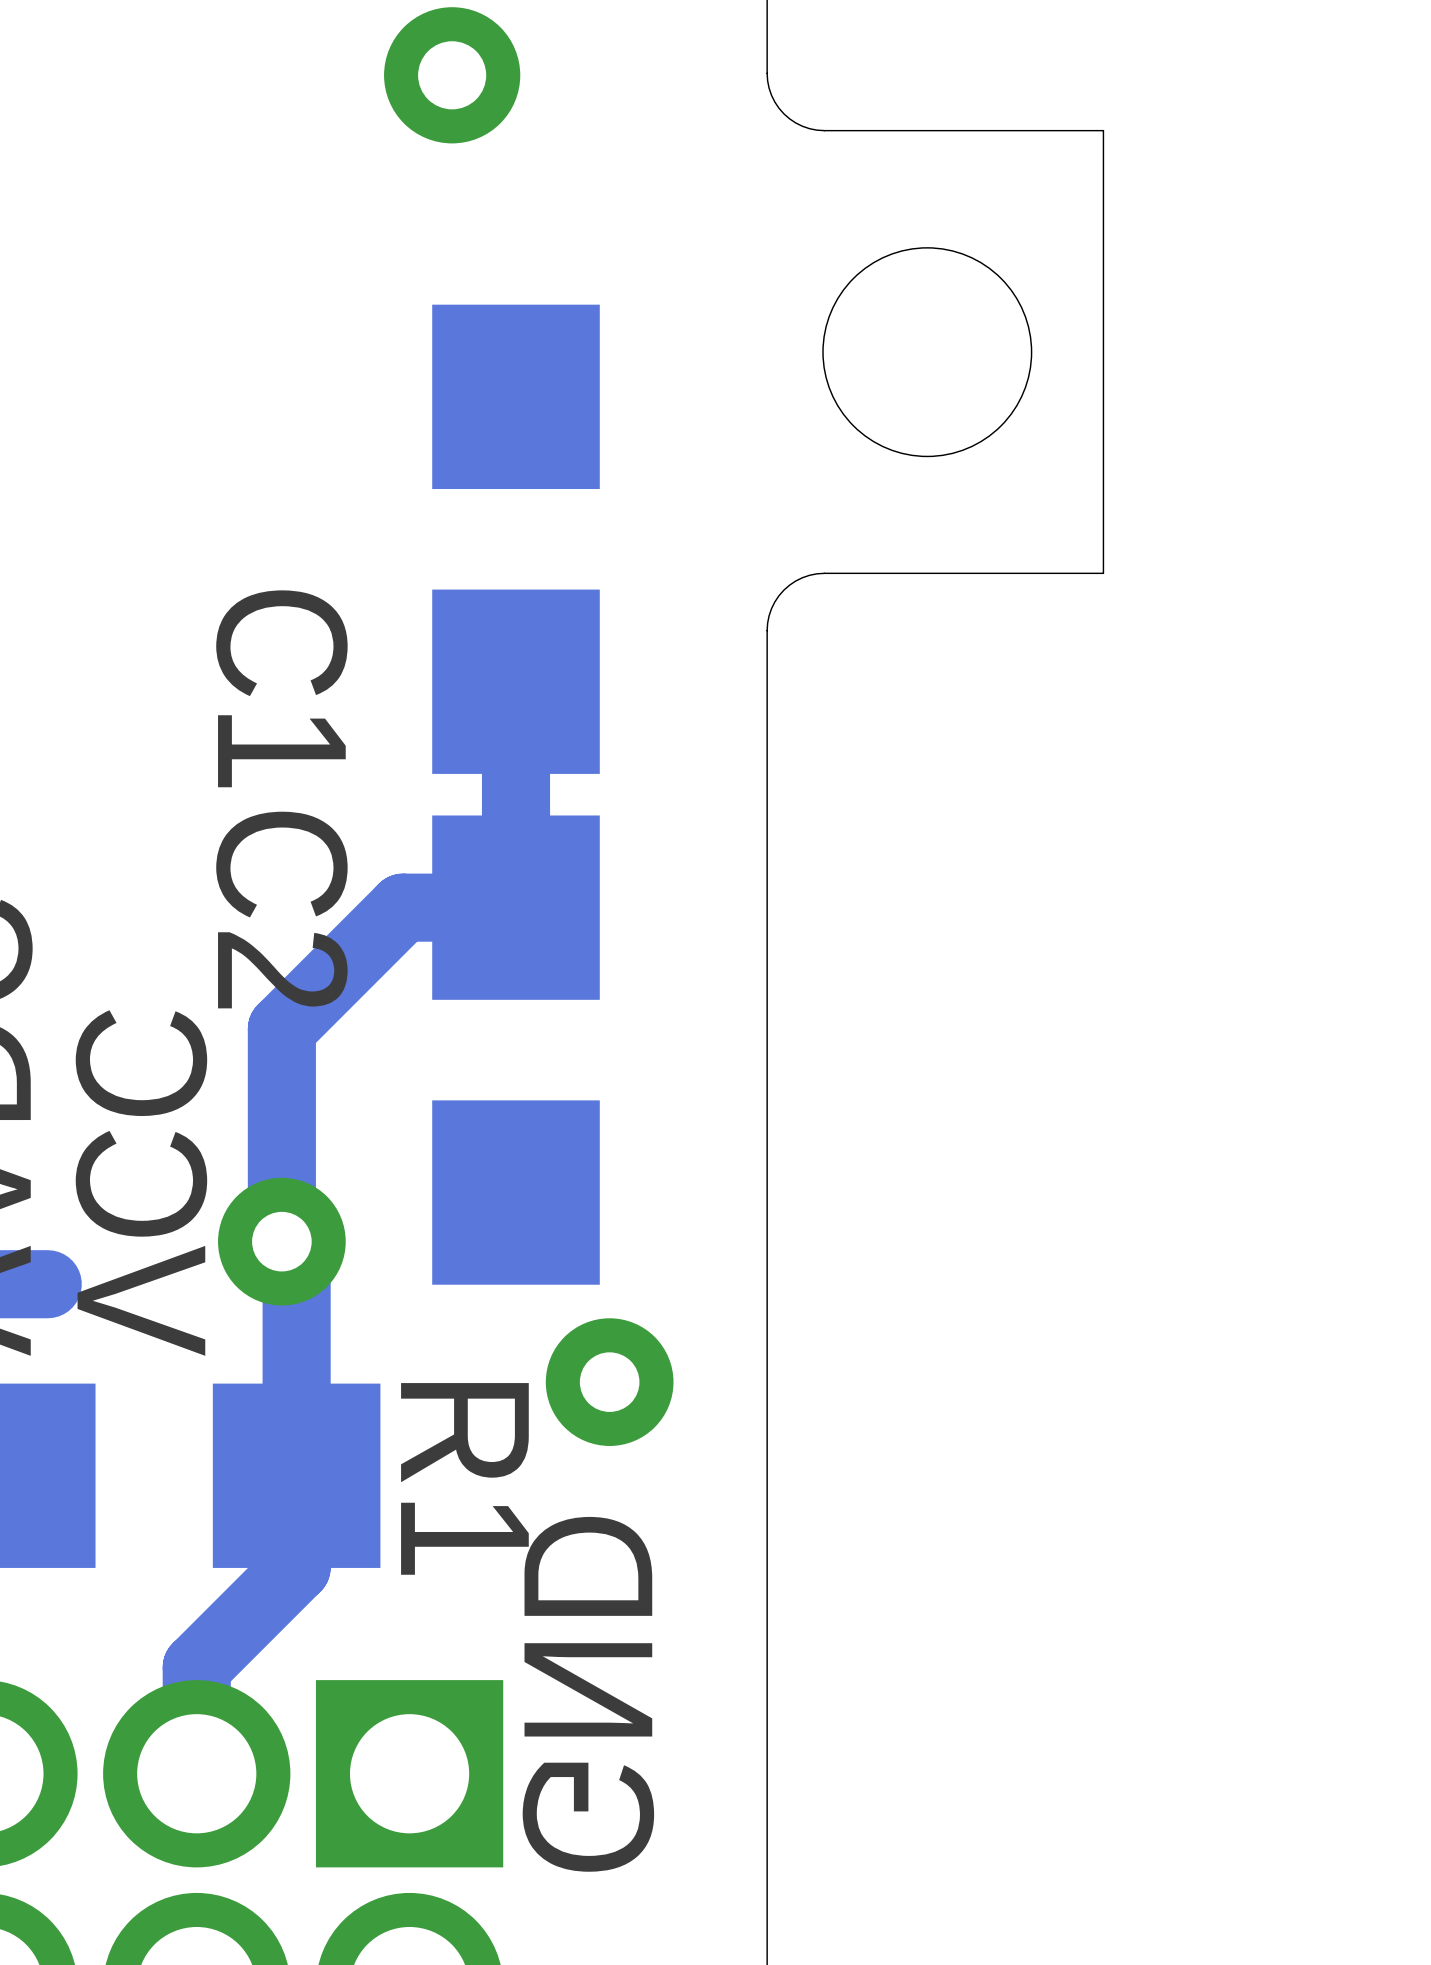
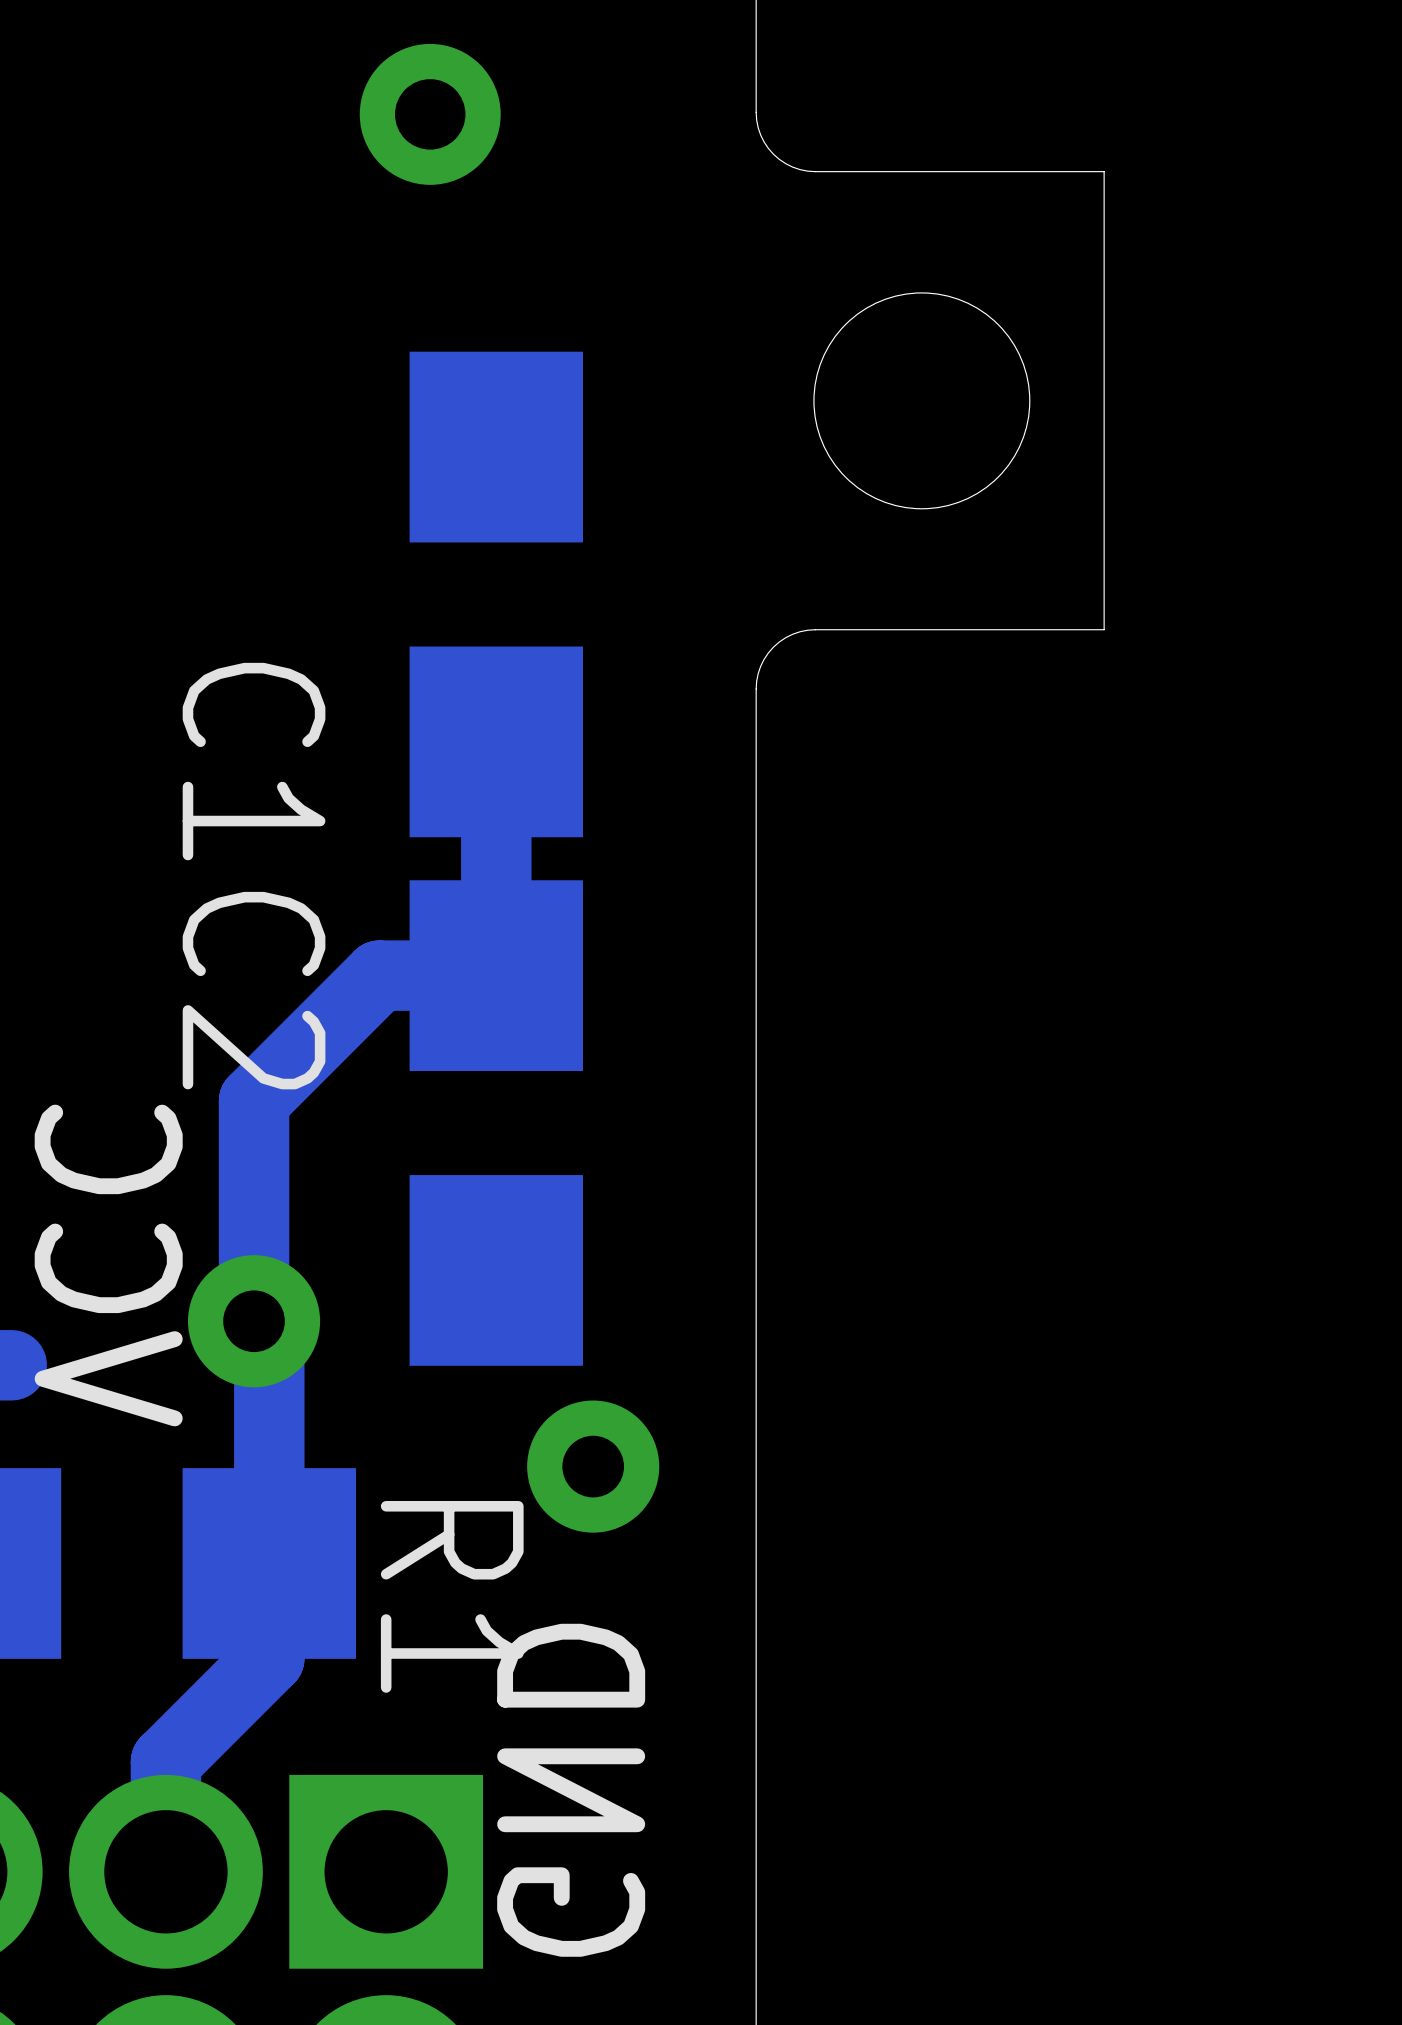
R1 name position: R1 (464, 1478) -> R1 (452, 1596)

